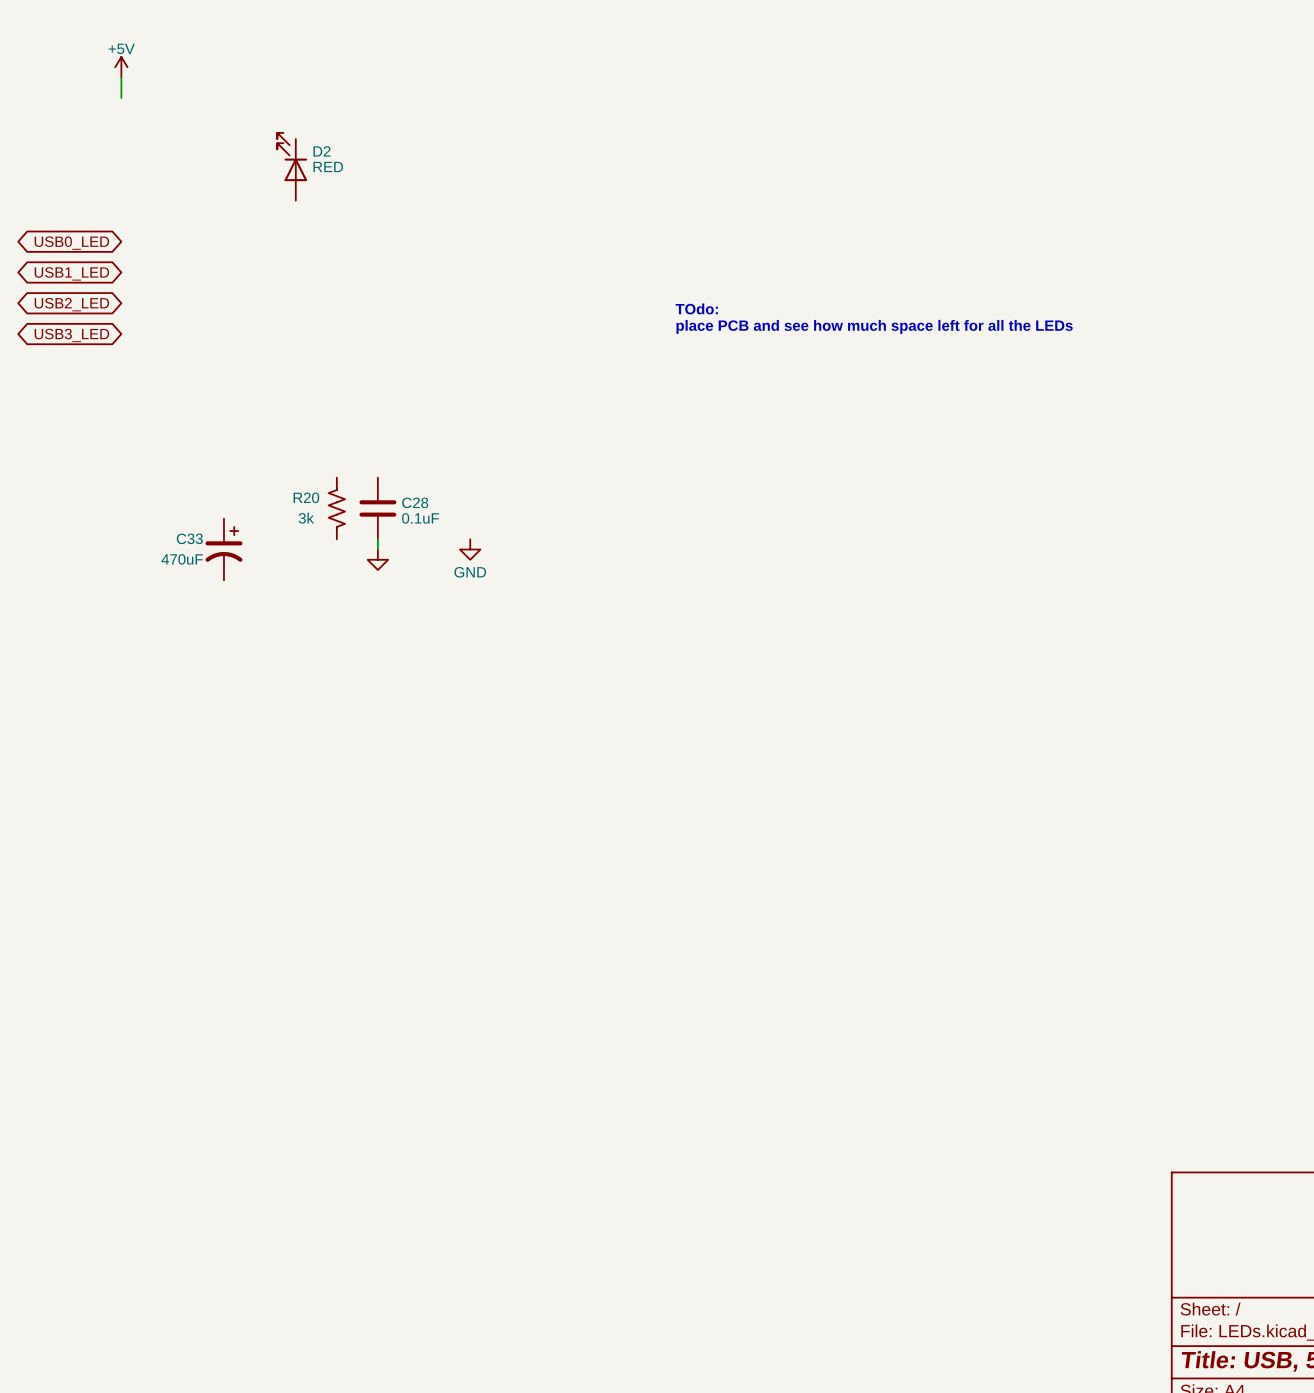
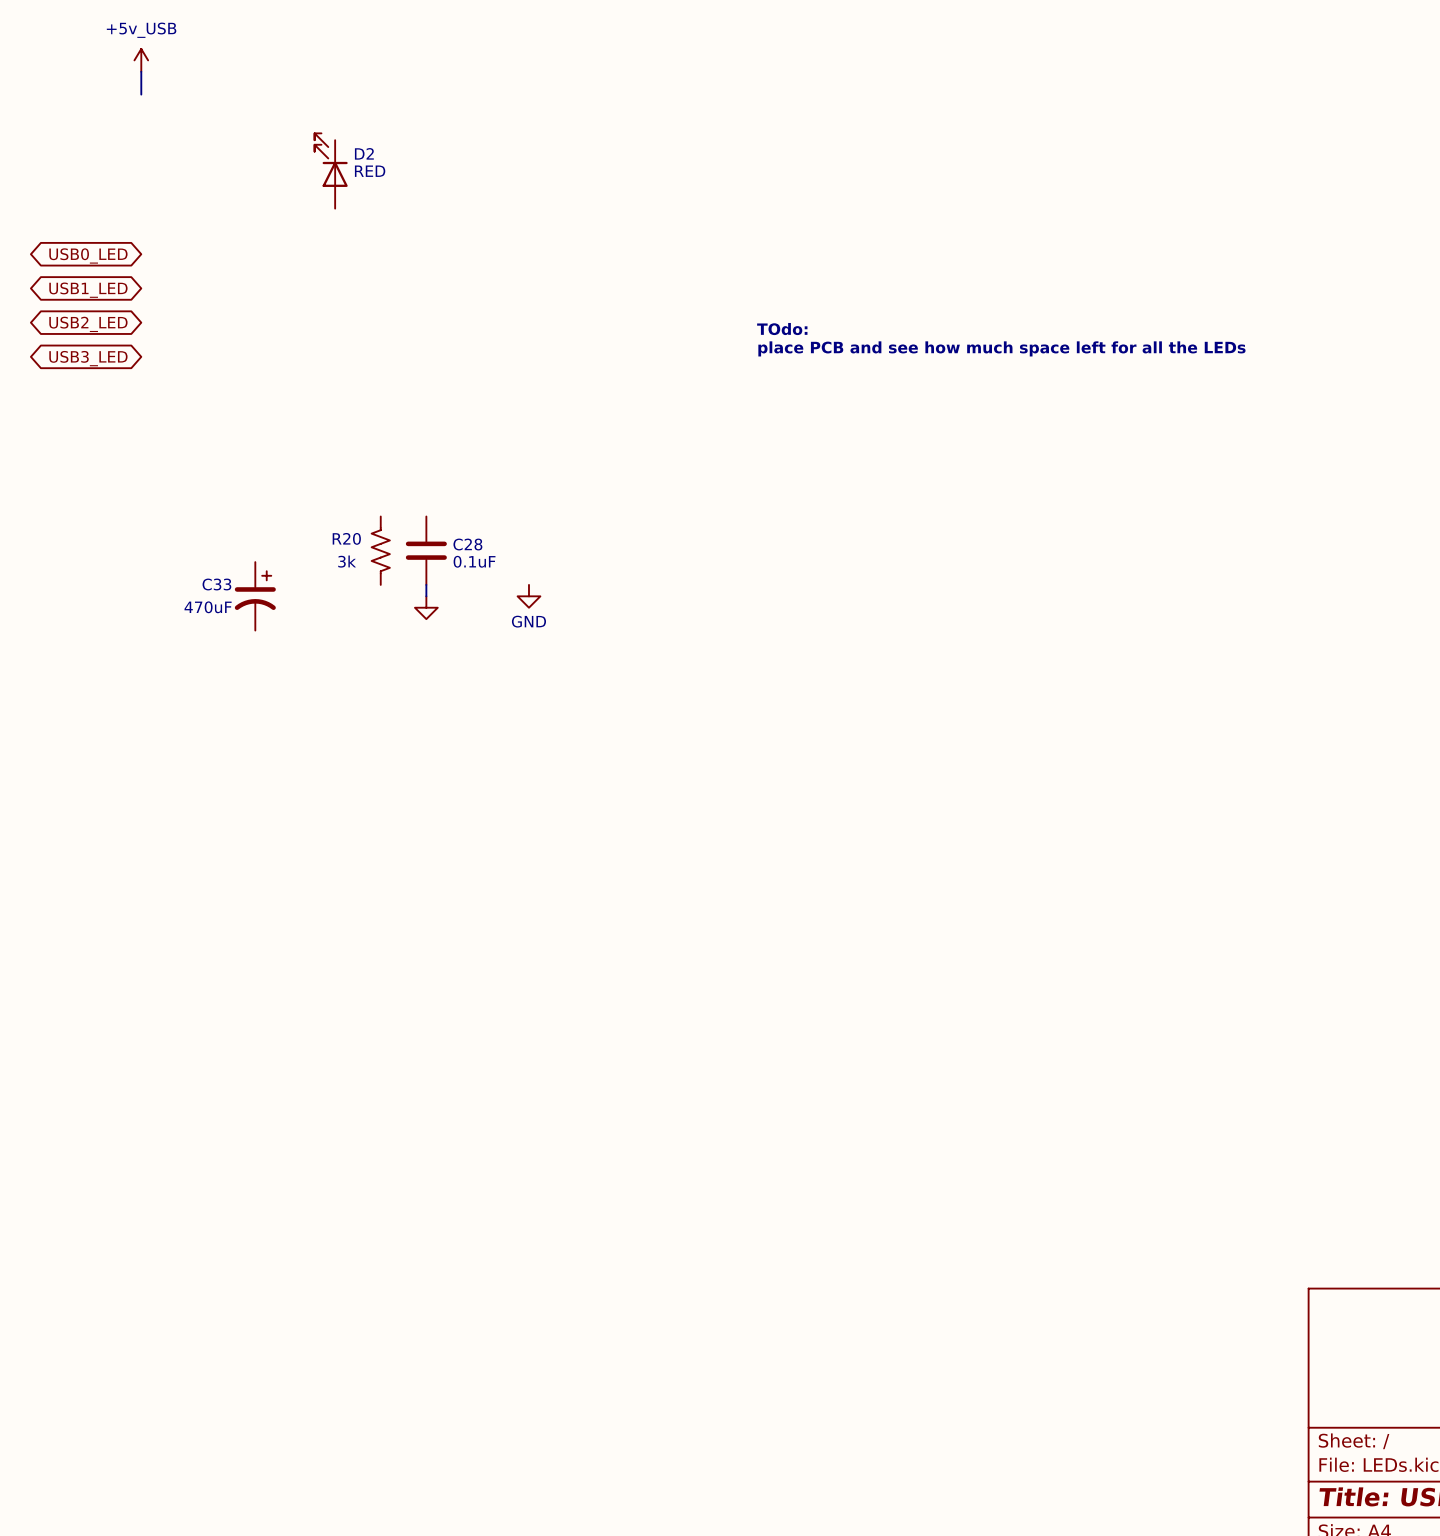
power symbol: +5V (121, 67) -> +5v_USB (141, 60)

